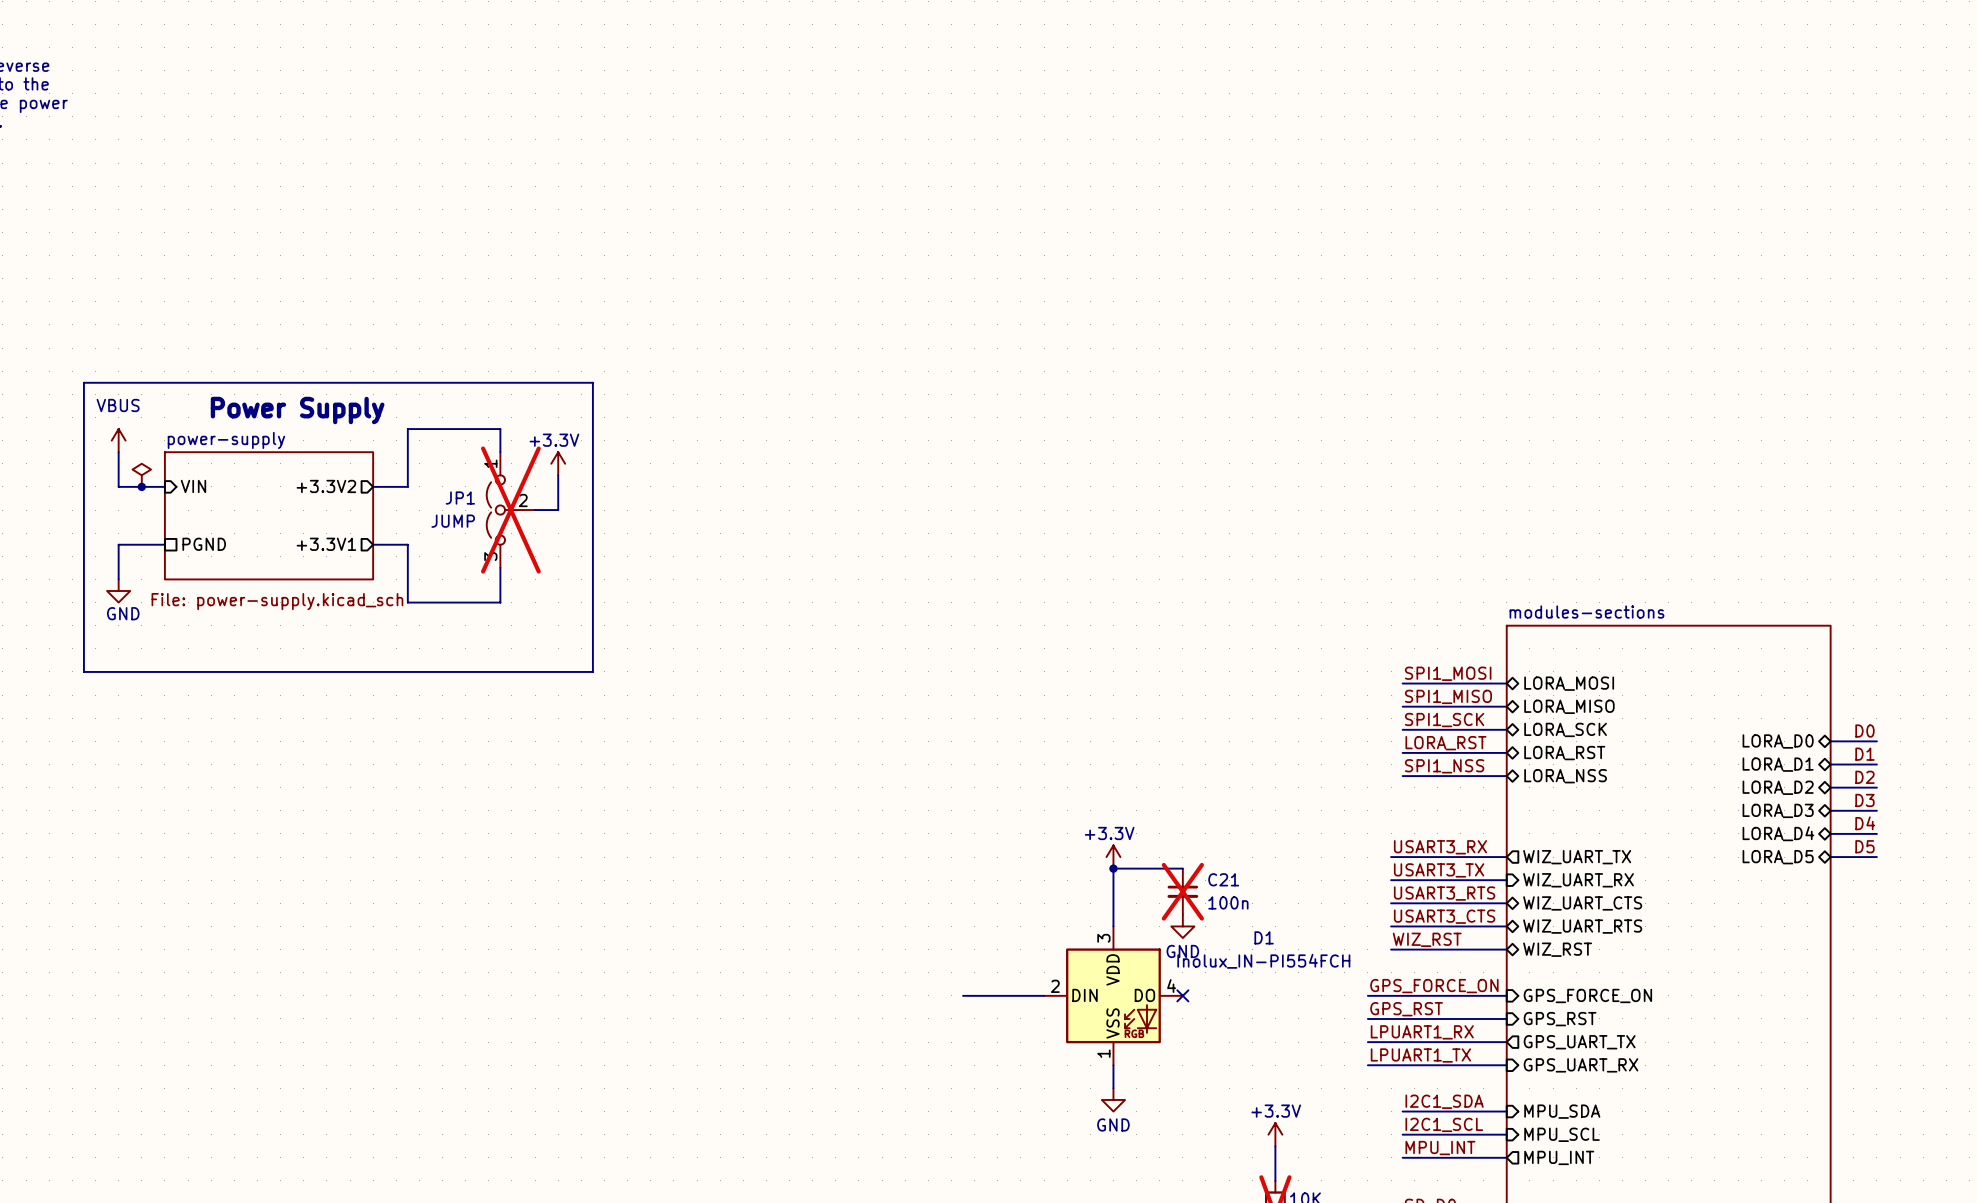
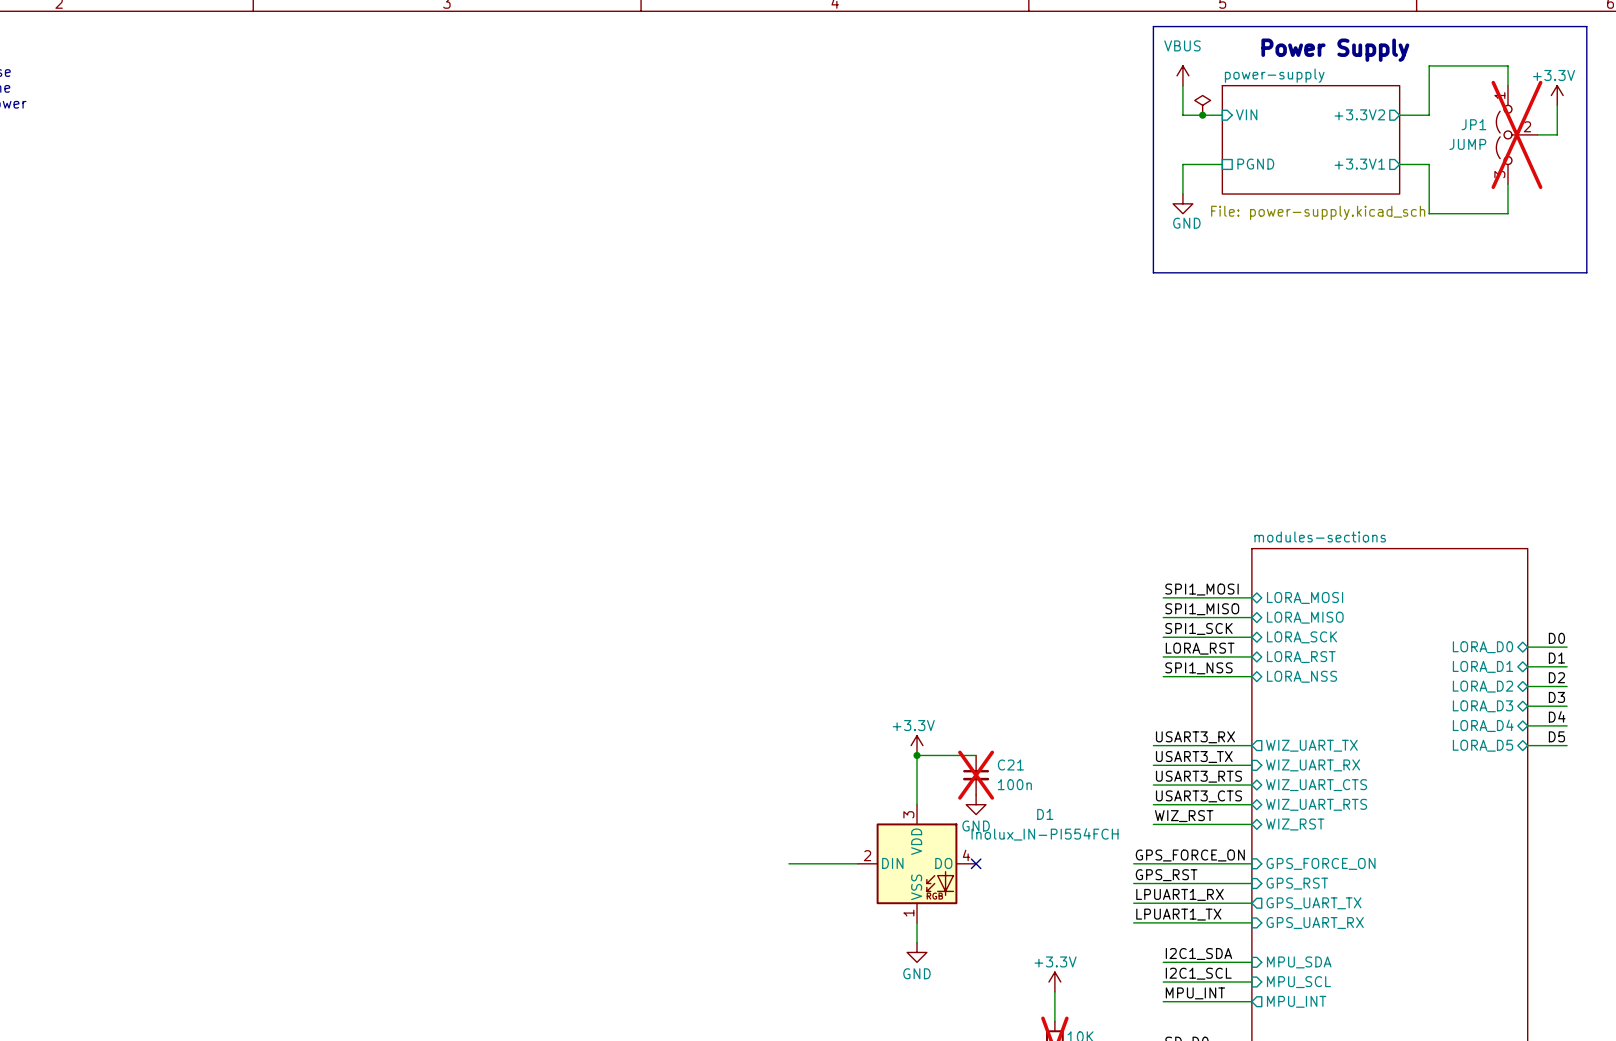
line: none -> (1153, 26) (1586, 26) (1586, 272) (1153, 272) (1153, 26)
text: none -> Power Supply (1335, 50)
power symbol: none -> VBUS (1182, 75)
wire: none -> (1182, 85) (1182, 115) (1222, 115)
wire: none -> (1508, 85) (1508, 65) (1429, 65) (1429, 115) (1399, 115)
power symbol: none -> +3.3V (1557, 95)
power symbol: none -> (1202, 105)
wire: none -> (1557, 105) (1557, 134) (1537, 134)
junction: none -> (1202, 115)
sheet pin: none -> VIN (1246, 114)
sheet pin: none -> +3.3V2 (1359, 114)
sheet power-supply: none -> File: power-supply.kicad_sch (1311, 139)
wire: none -> (1222, 164) (1182, 164) (1182, 194)
sheet pin: none -> PGND (1255, 164)
sheet pin: none -> +3.3V1 (1359, 164)
wire: none -> (1399, 164) (1429, 164) (1429, 213) (1508, 213) (1508, 184)
power symbol: none -> GND (1182, 203)
line: (83, 382) (592, 382) (592, 671) (83, 671) (83, 382) -> none
text: Power Supply (297, 410) -> none
power symbol: VBUS (118, 440) -> none
wire: (118, 452) (118, 486) (164, 486) -> none
wire: (500, 452) (500, 429) (407, 429) (407, 486) (373, 486) -> none
power symbol: +3.3V (558, 463) -> none
power symbol: (141, 475) -> none
wire: (558, 475) (558, 510) (535, 510) -> none
junction: (141, 486) -> none
sheet pin: VIN (193, 486) -> none
sheet pin: +3.3V2 (326, 486) -> none
JP1 position: (510, 510) -> (1516, 134)
sheet power-supply: File: power-supply.kicad_sch (269, 515) -> none
wire: (164, 544) (118, 544) (118, 579) -> none
sheet pin: PGND (204, 544) -> none
sheet pin: +3.3V1 (326, 544) -> none
wire: (373, 544) (407, 544) (407, 602) (500, 602) (500, 567) -> none
power symbol: GND (118, 591) -> none

